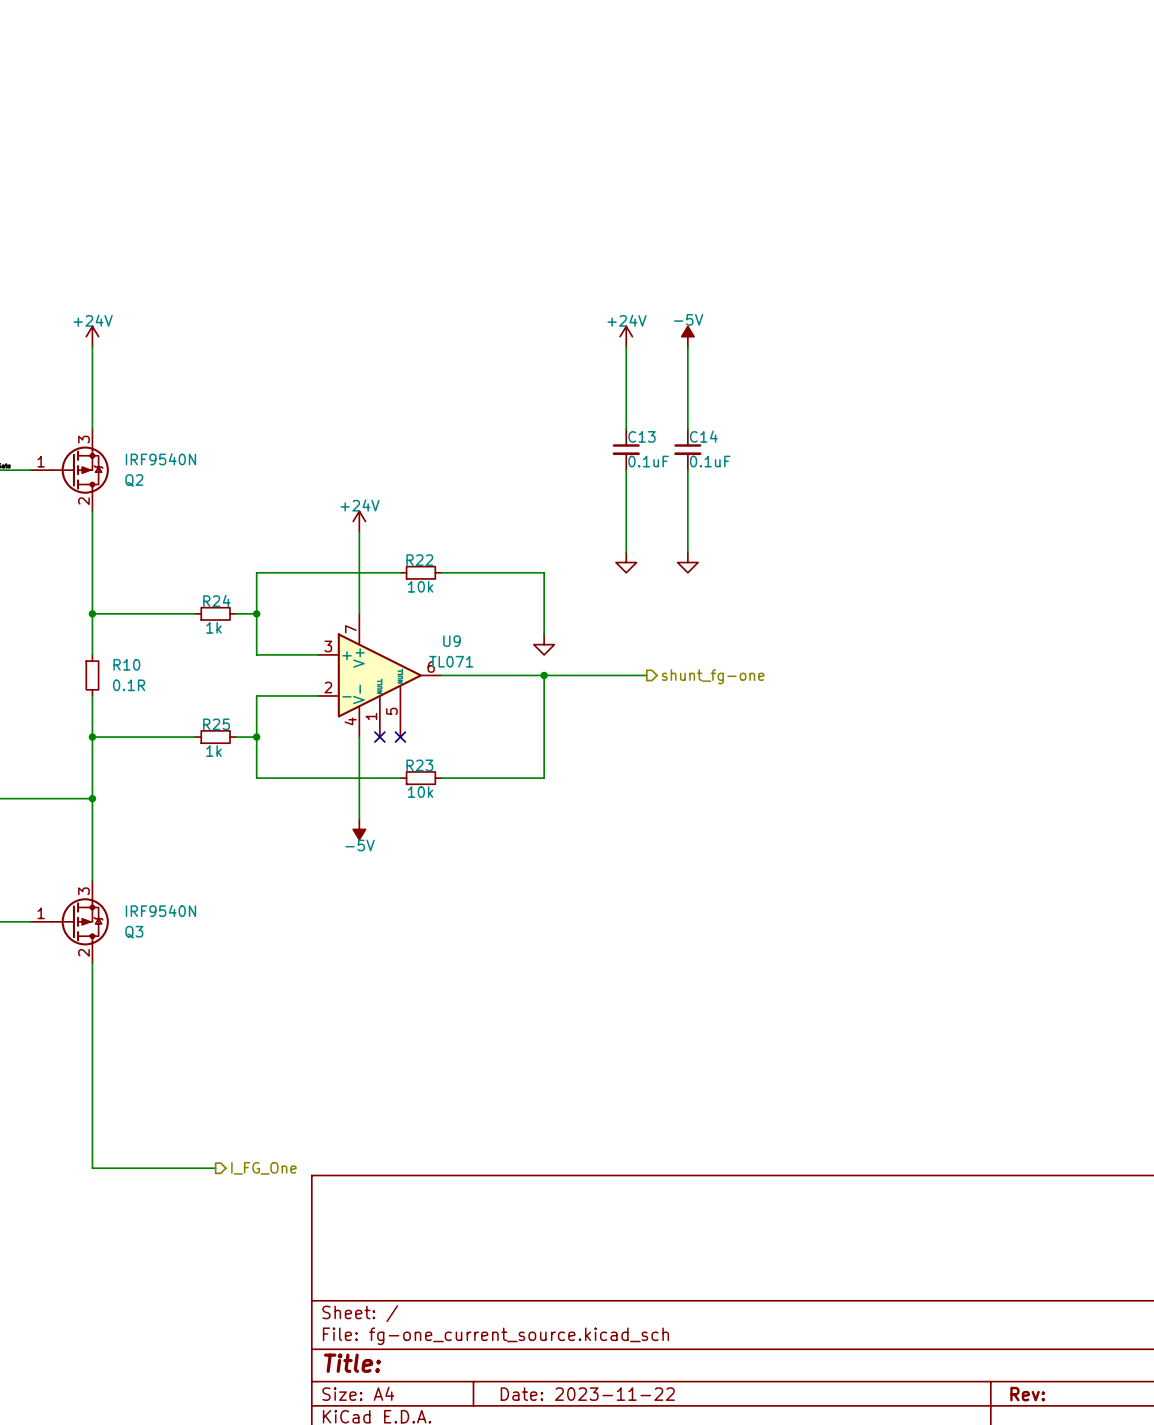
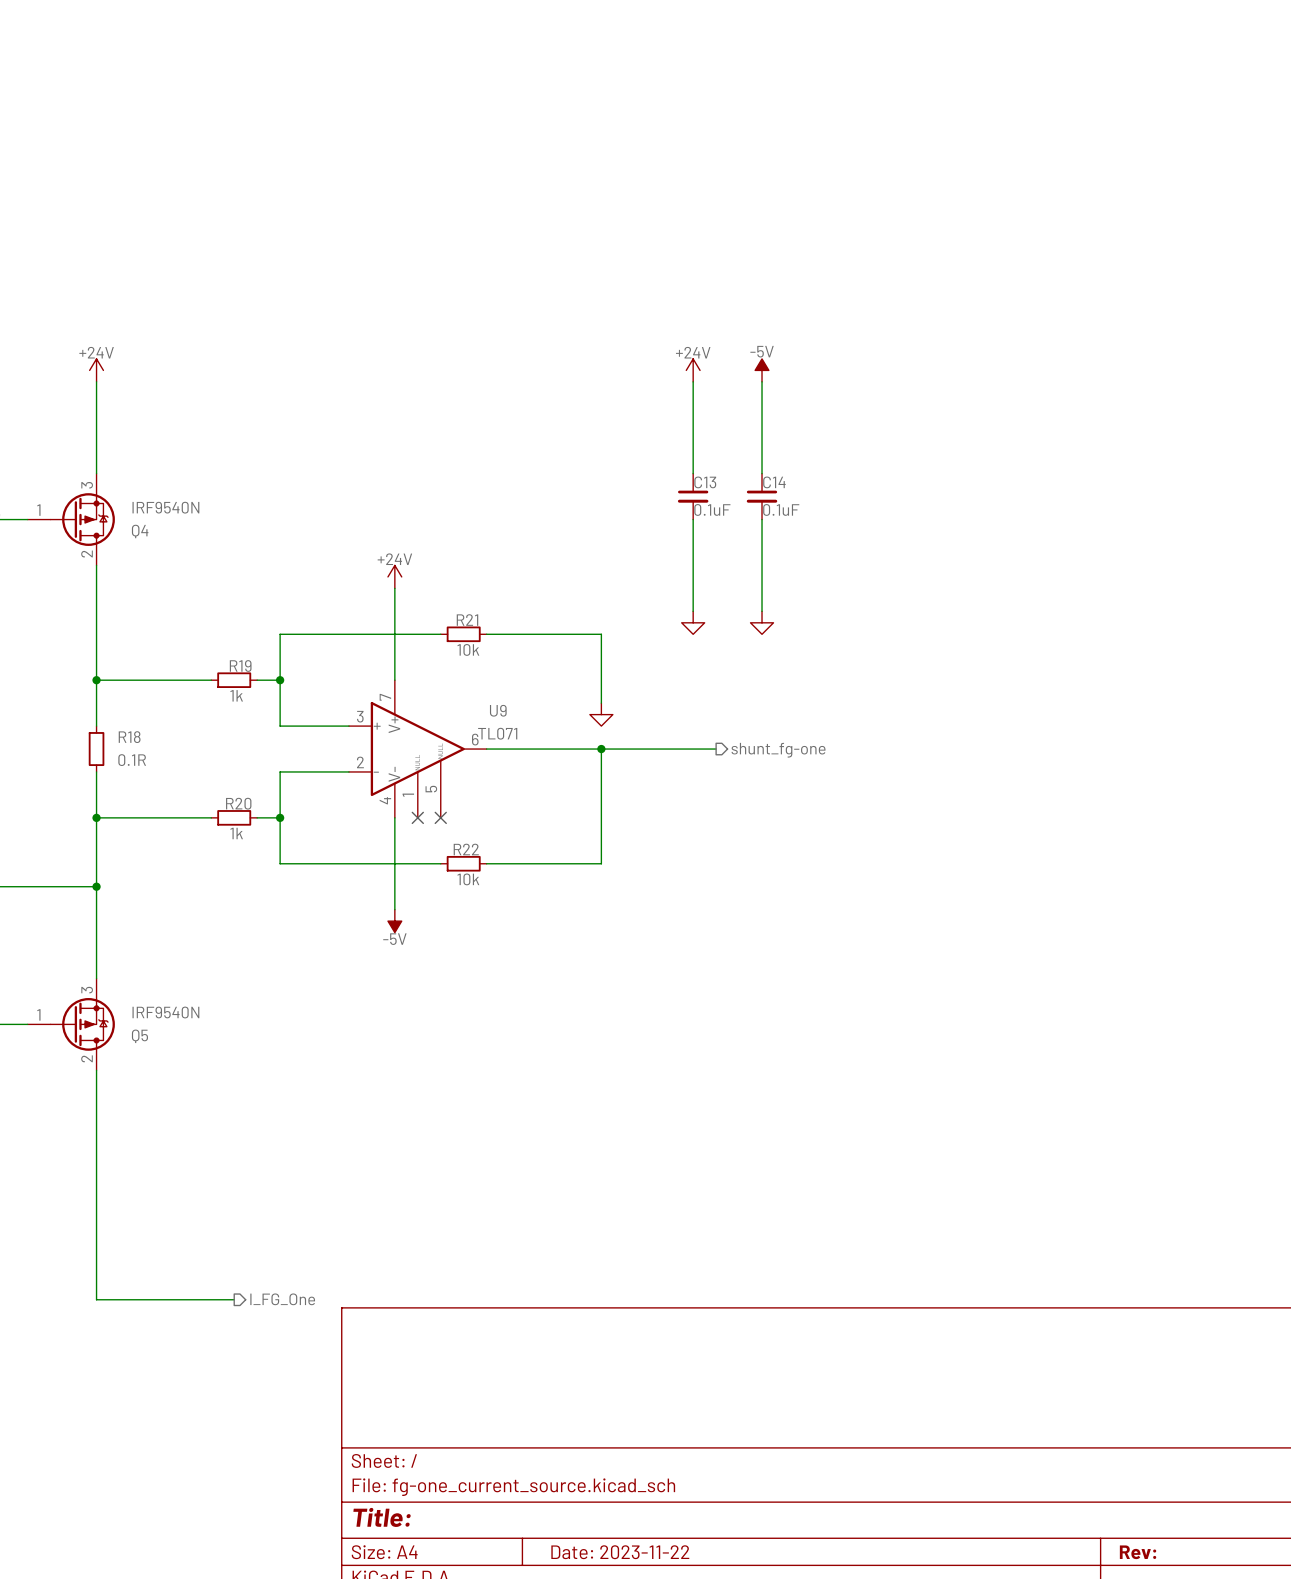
Q2 name: Q2 (134, 480) -> Q4 (140, 531)
R22 name: R22 (419, 560) -> R21 (467, 620)
R24 name: R24 (216, 600) -> R19 (240, 666)
R10 name: R10 (126, 664) -> R18 (129, 737)
R25 name: R25 (216, 724) -> R20 (238, 803)
R23 name: R23 (419, 765) -> R22 (466, 849)
Q3 name: Q3 (134, 932) -> Q5 (139, 1036)

